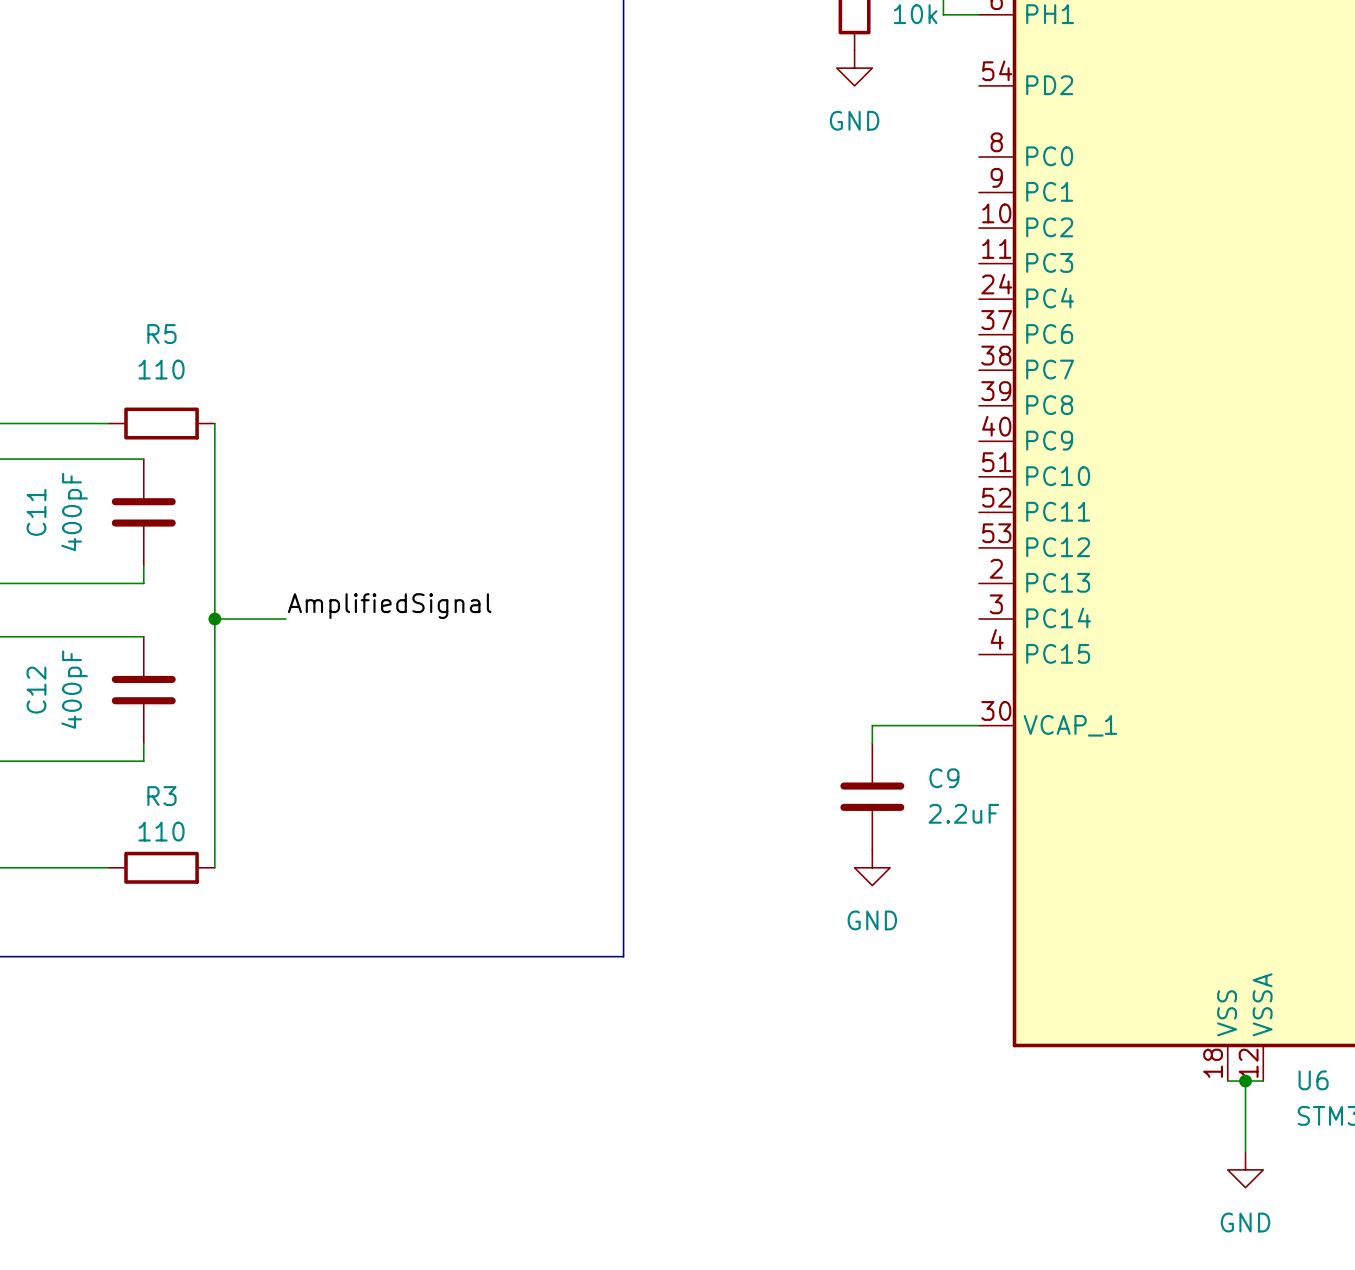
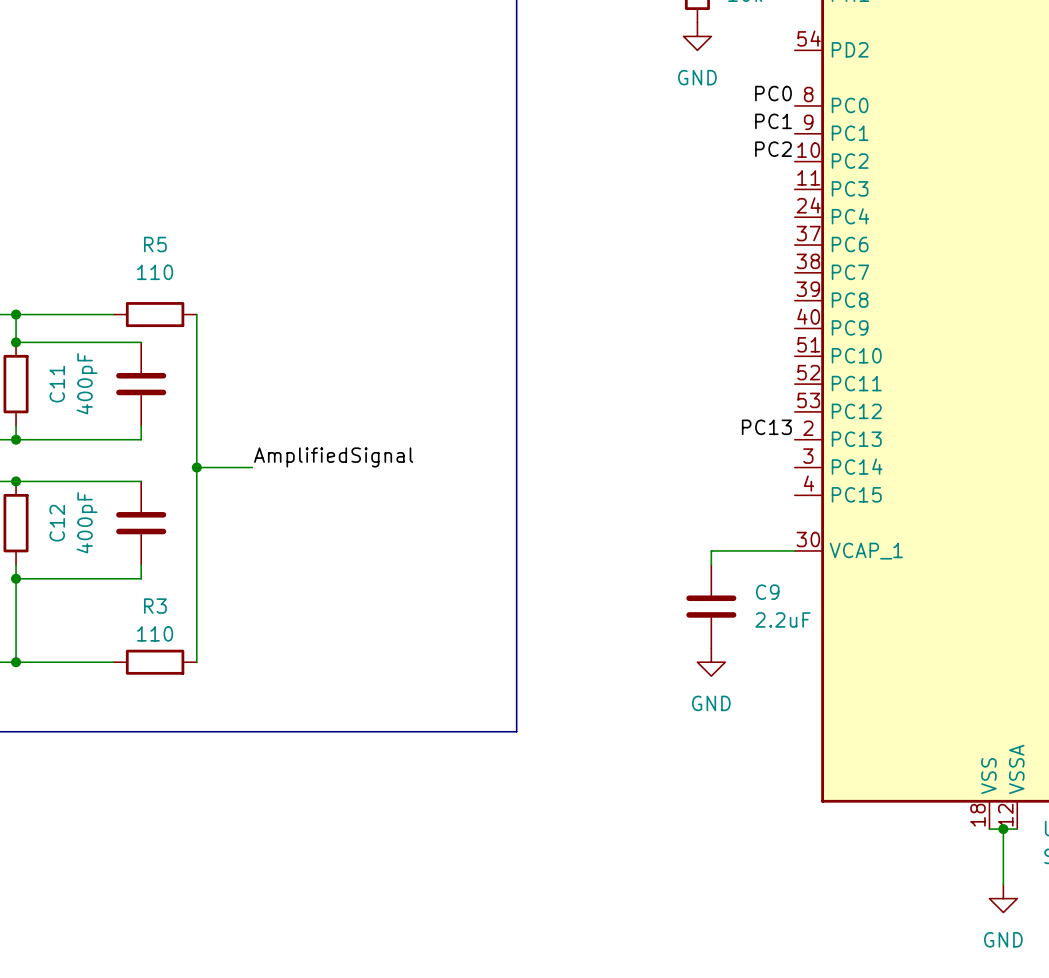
label: none -> PC0 (773, 93)
label: none -> PC1 (773, 121)
label: none -> PC2 (773, 149)
label: none -> PC13 (766, 427)

